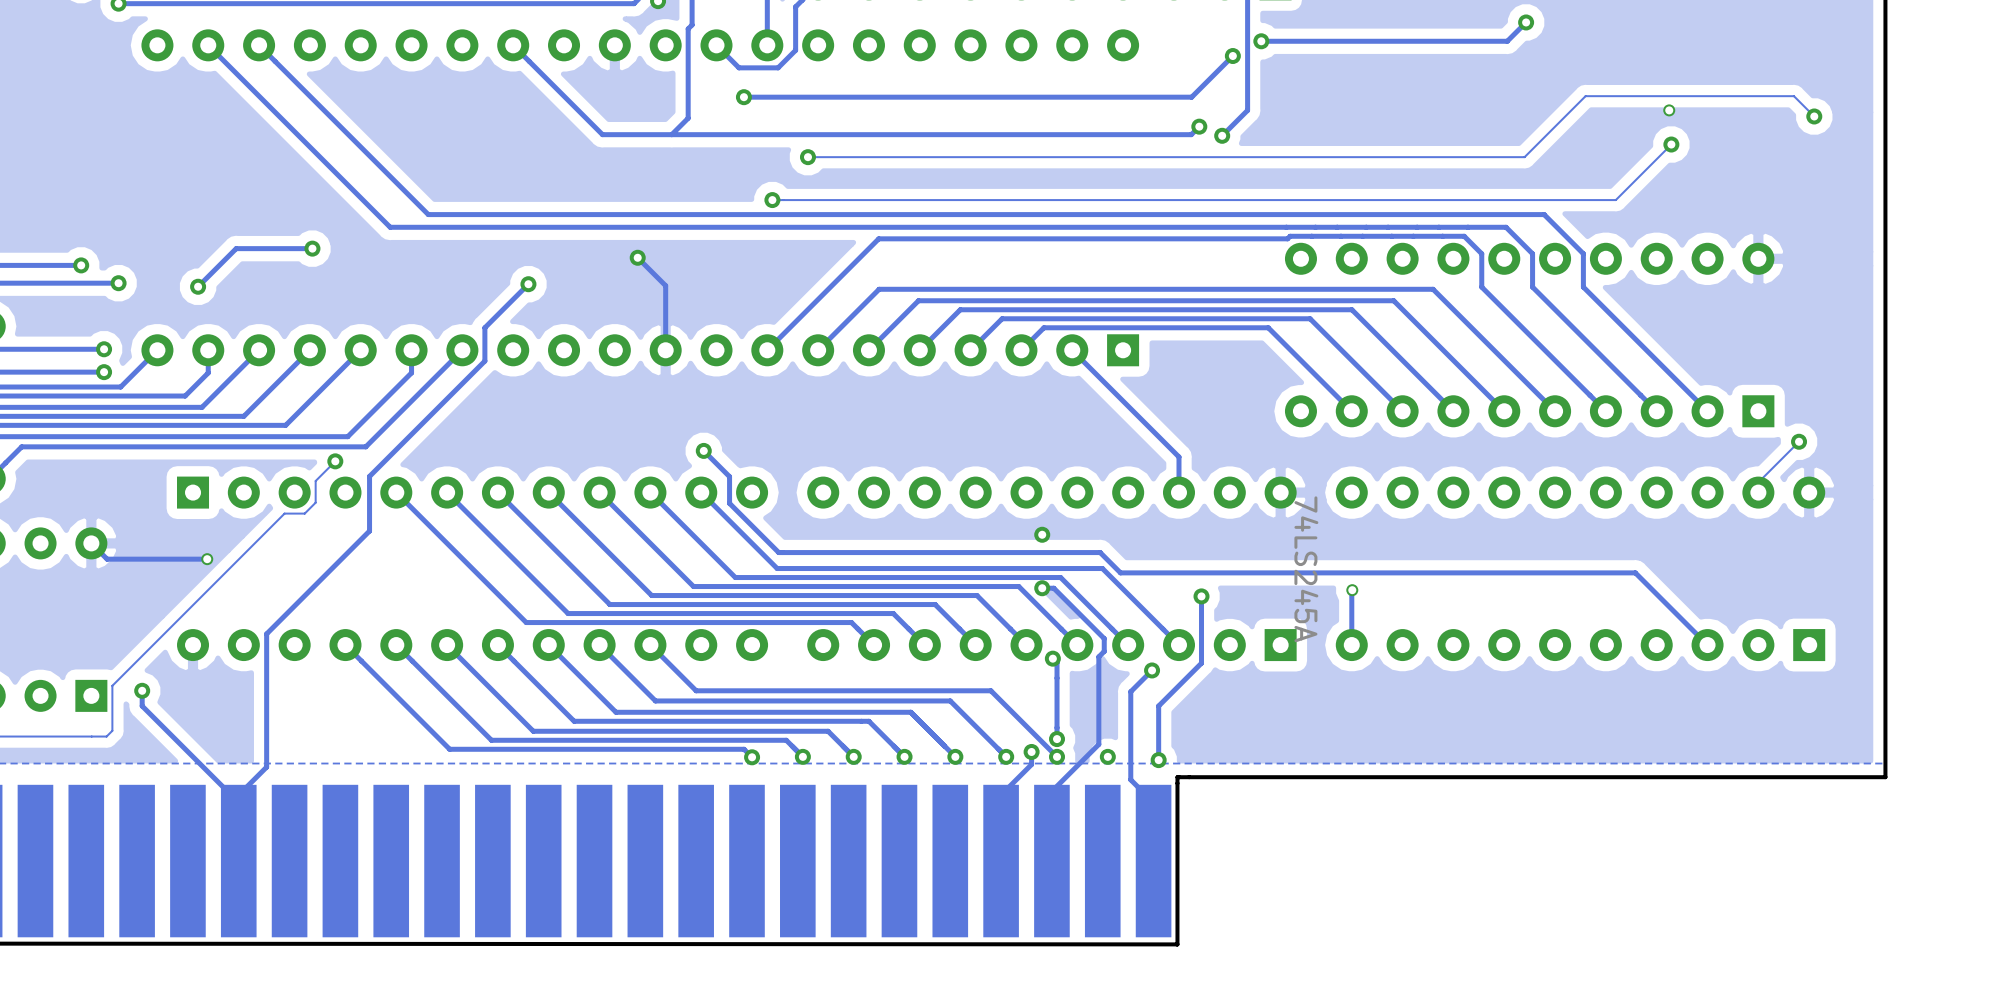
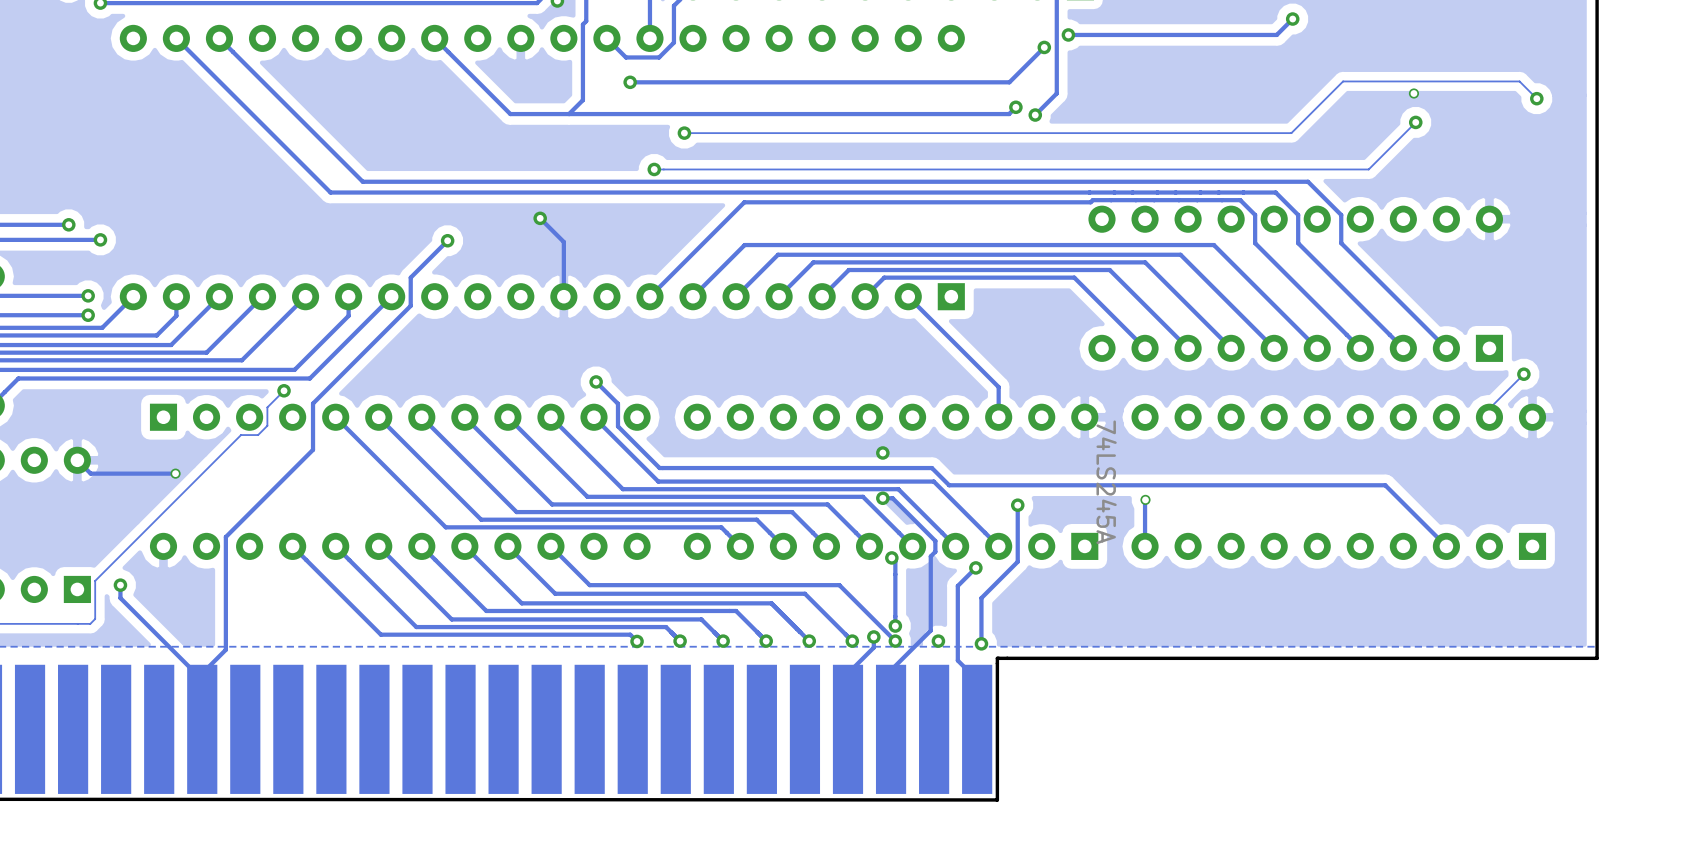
track: (312, 248) (236, 248) (198, 286) -> none
via: (312, 248) -> none
via: (198, 286) -> none

